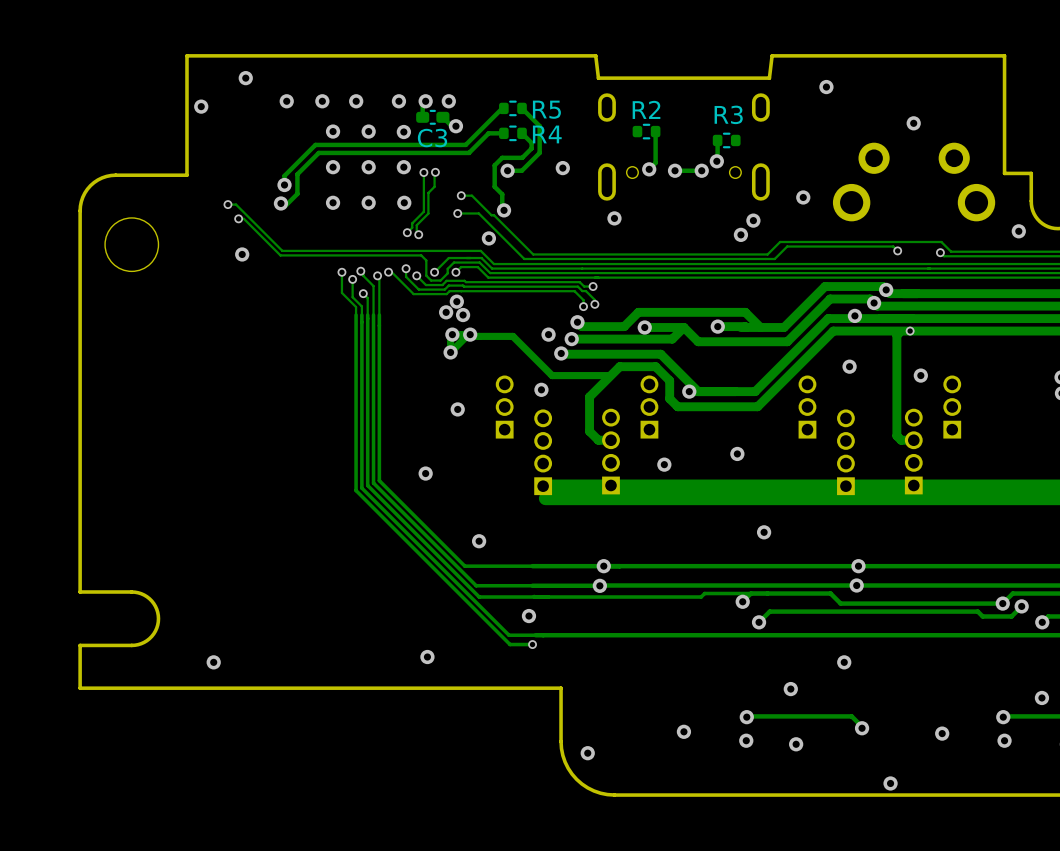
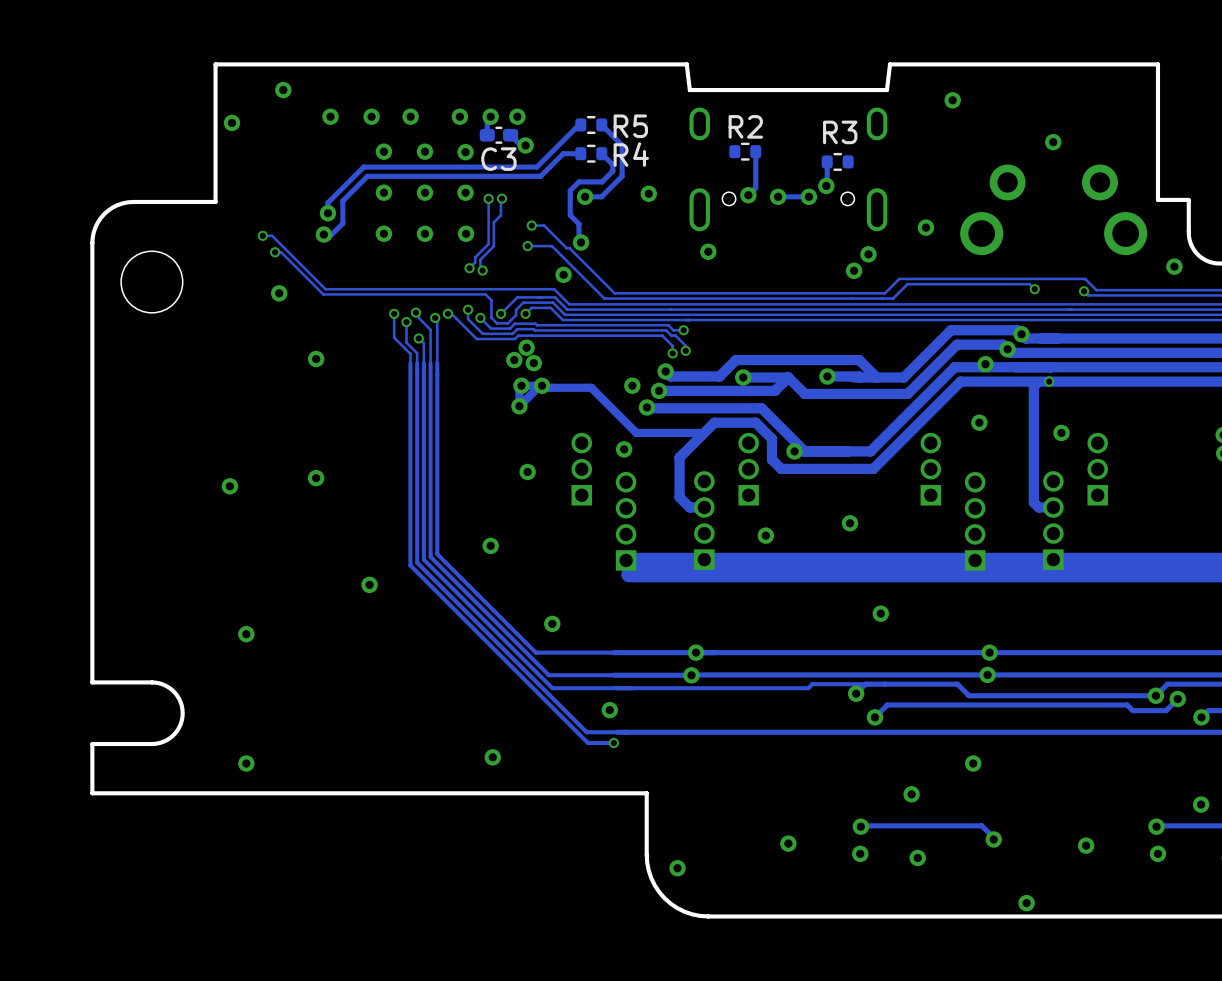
via: none -> (316, 359)
via: none -> (316, 478)
via: none -> (229, 486)
via: none -> (369, 584)
via: none -> (246, 634)

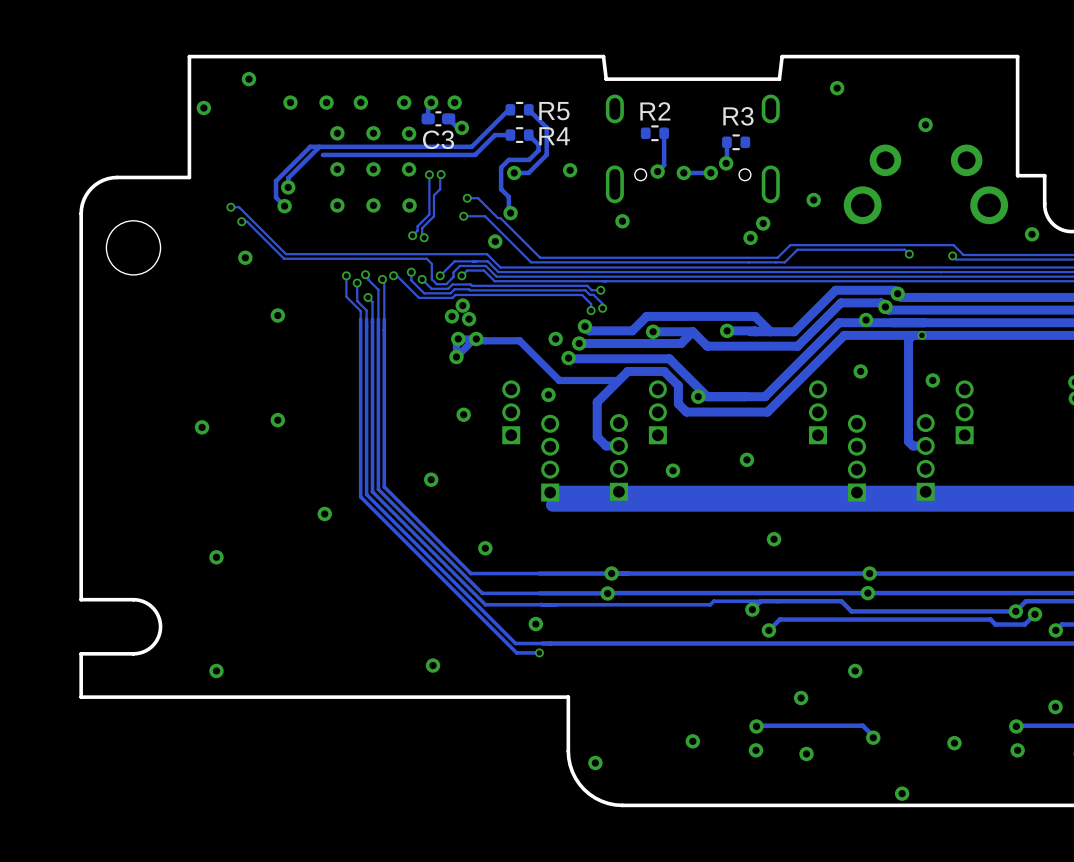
track: none -> (319, 146) (310, 146) (276, 181) (276, 197) (284, 206)
track: (367, 176) (342, 200) (342, 223) (328, 237) -> none

